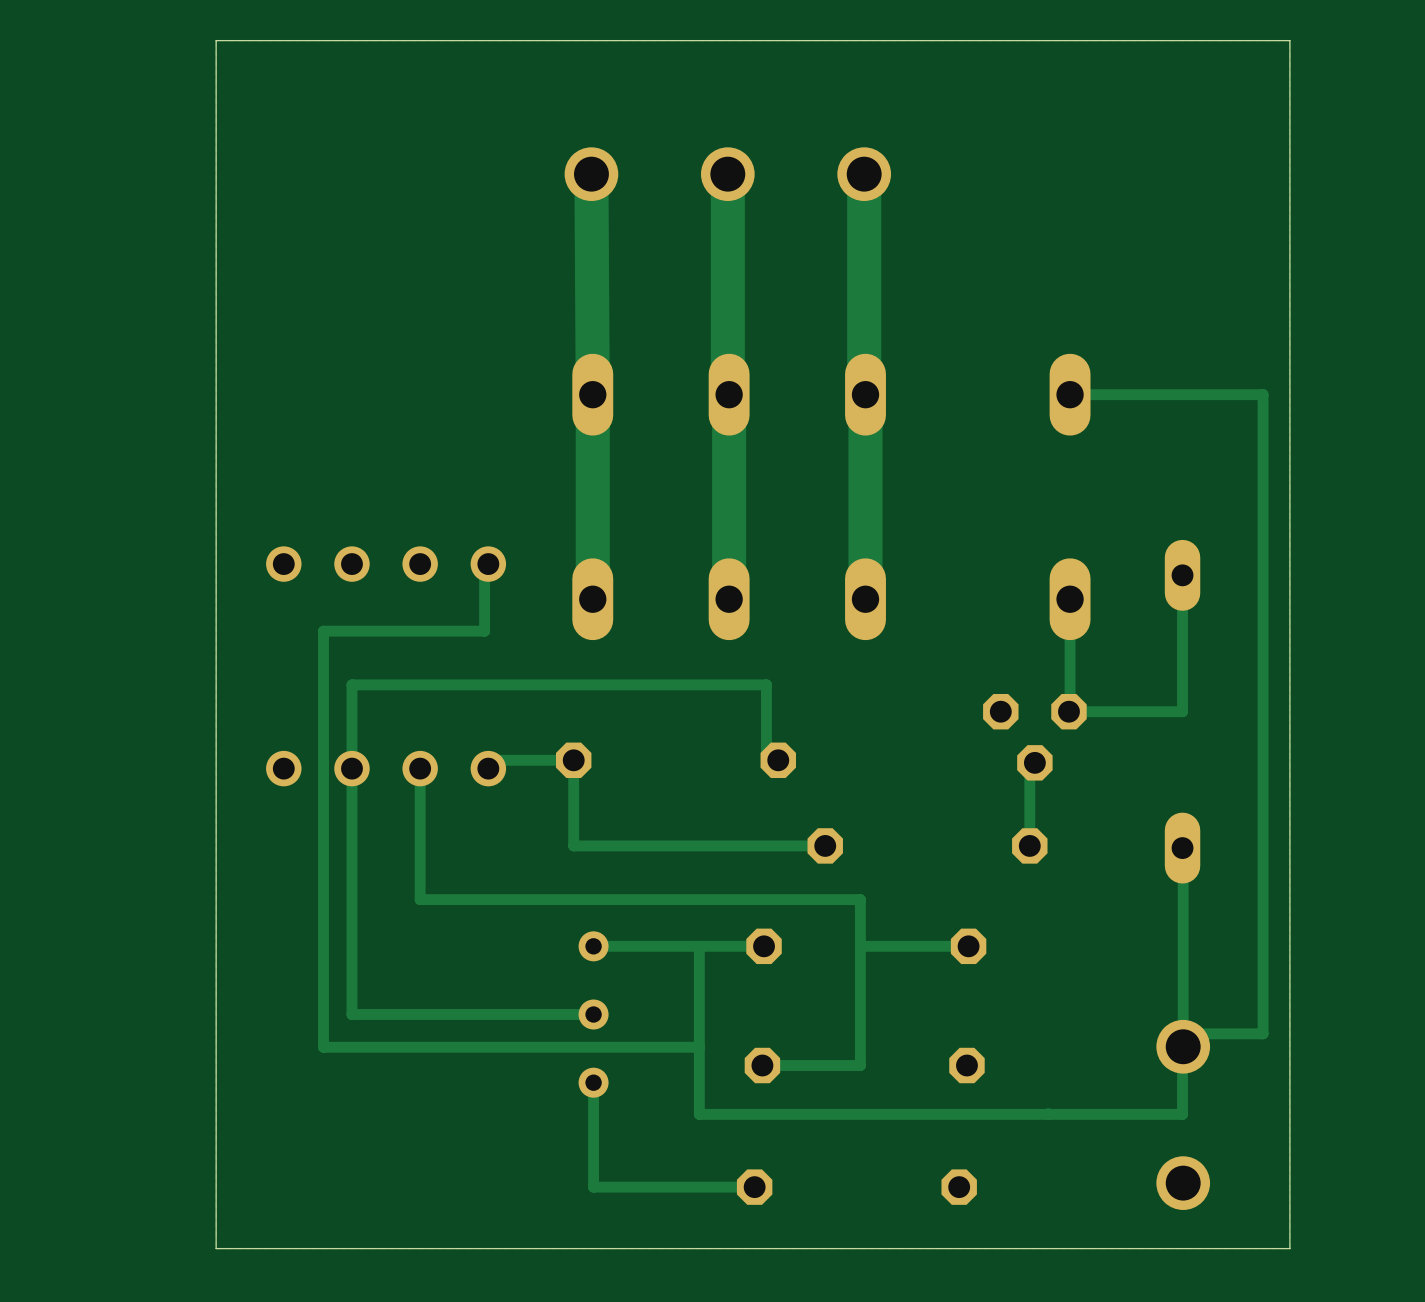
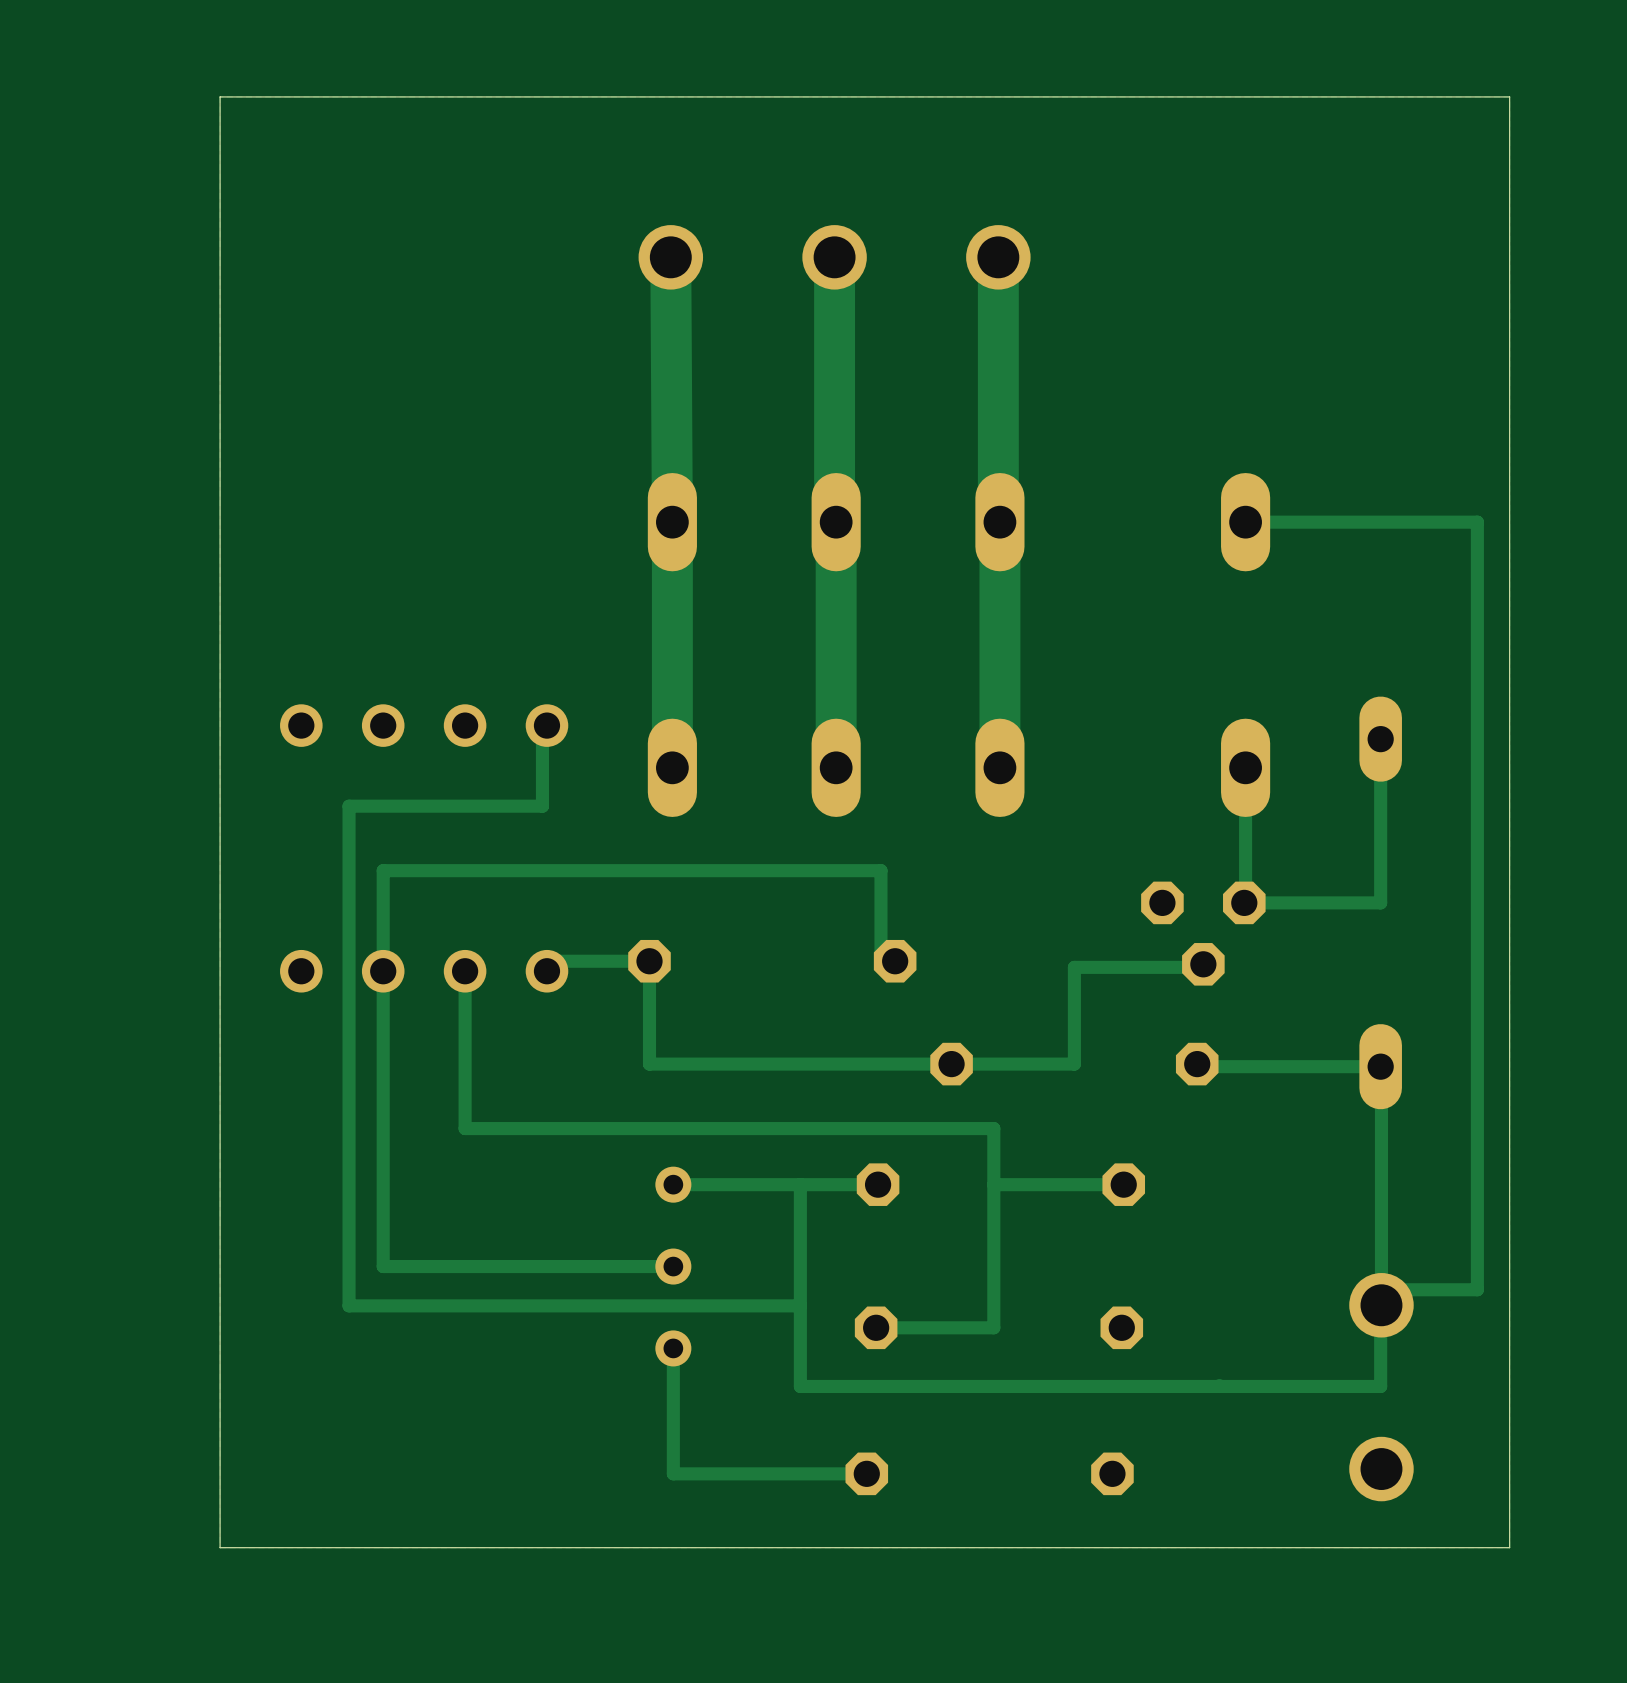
track: (1034, 762) (1029, 762) (1029, 845) -> (1380, 1066) (1197, 1066) (1197, 1064)
track: none -> (1203, 964) (1203, 967) (1074, 967) (1074, 1064) (951, 1064)

